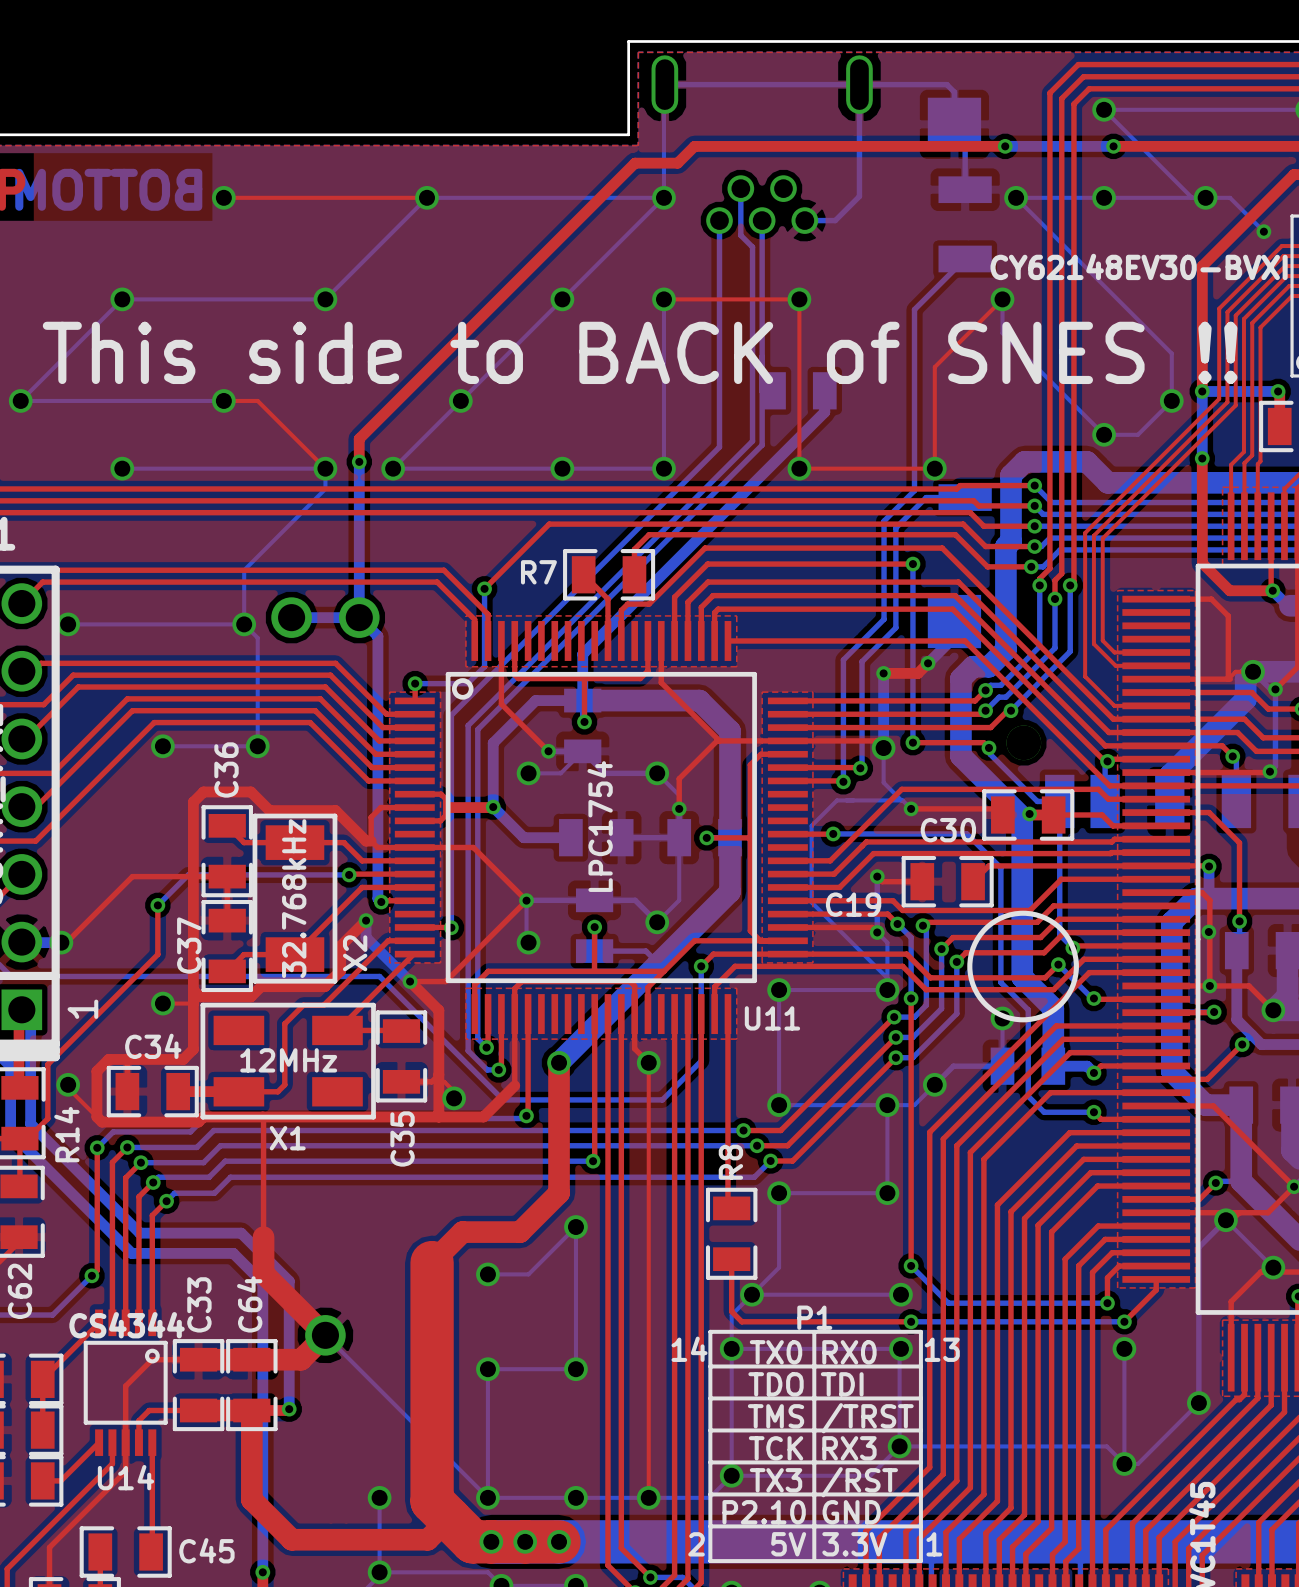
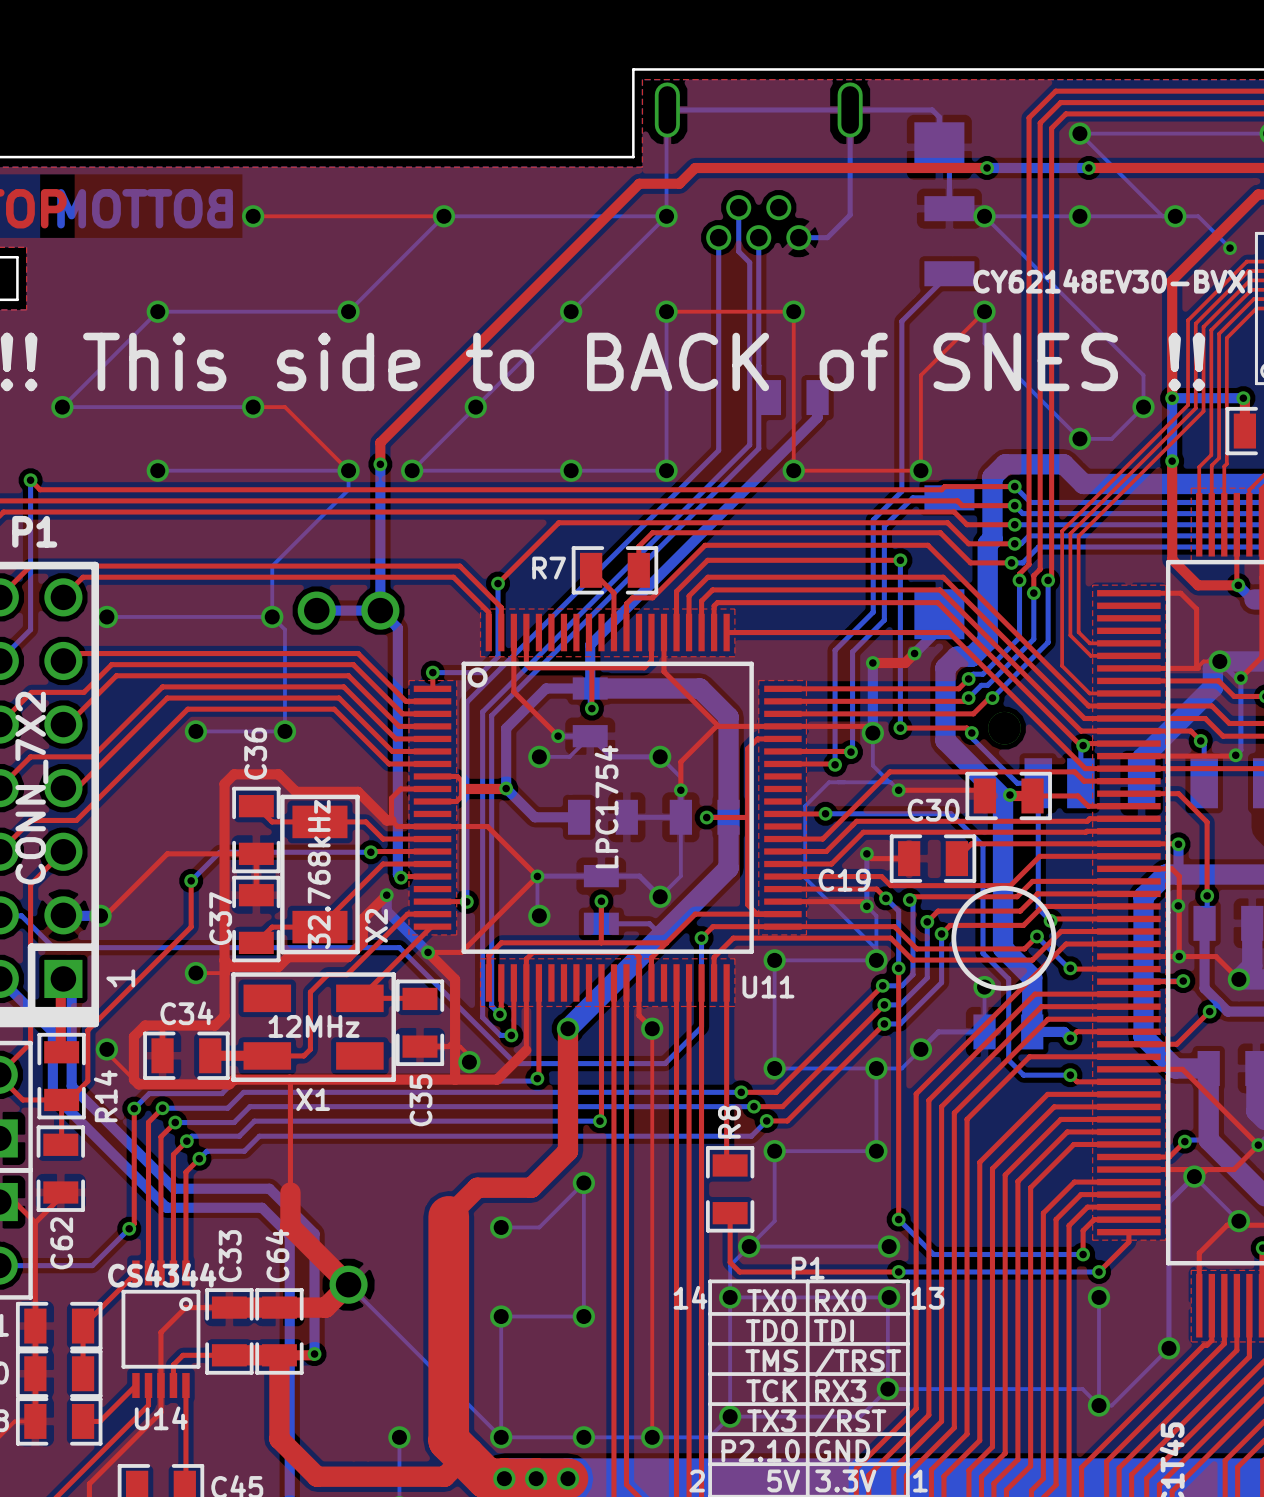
bottom track: (1016, 197) (1171, 353) (1171, 367) -> (997, 216) (984, 216) (1143, 375)
via position: (1016, 197) -> (984, 216)

